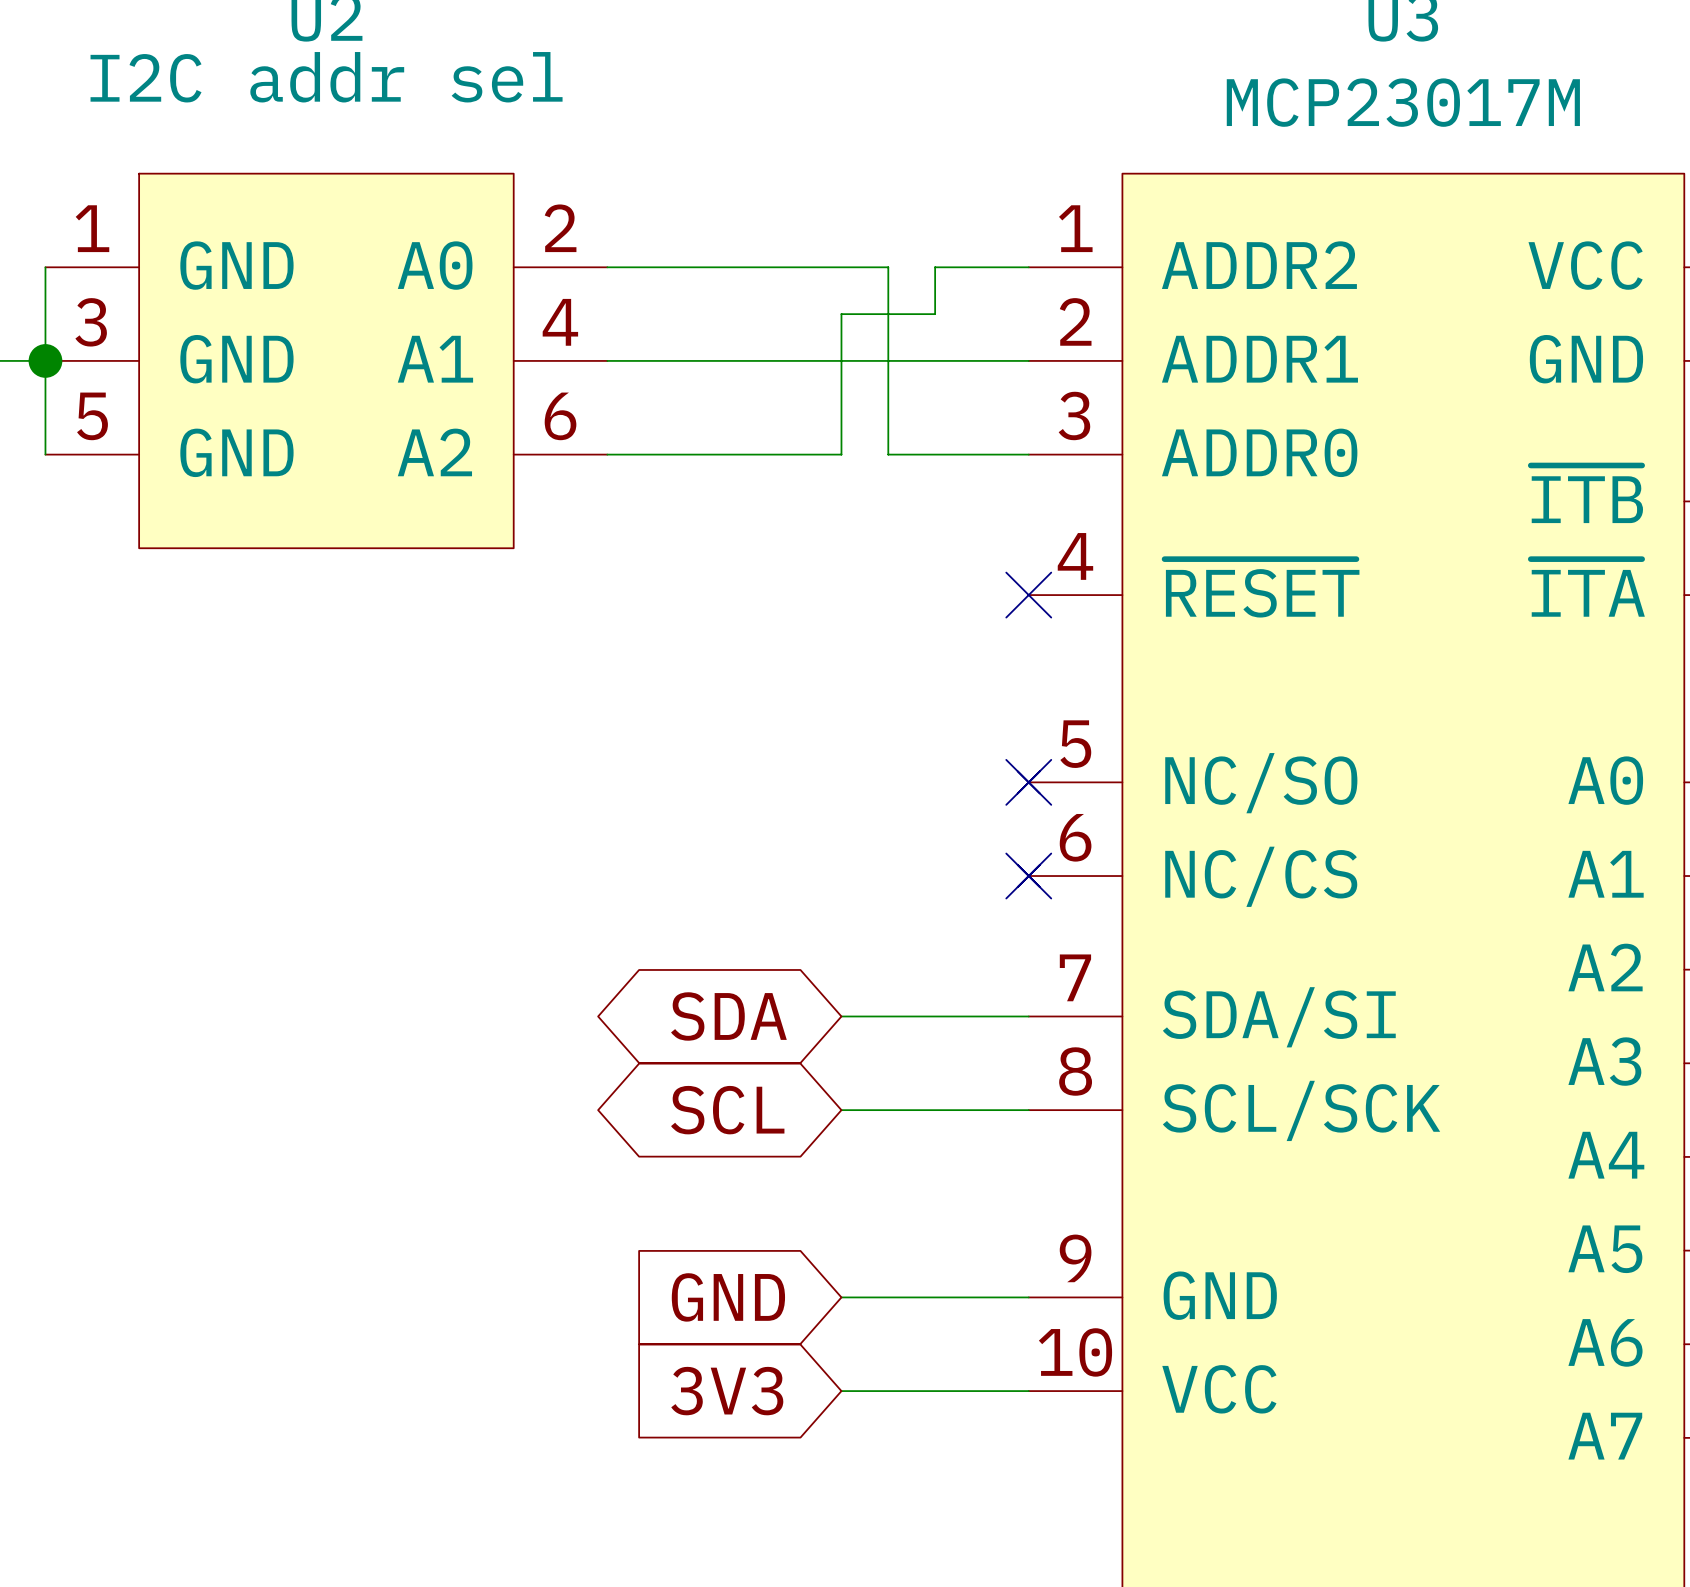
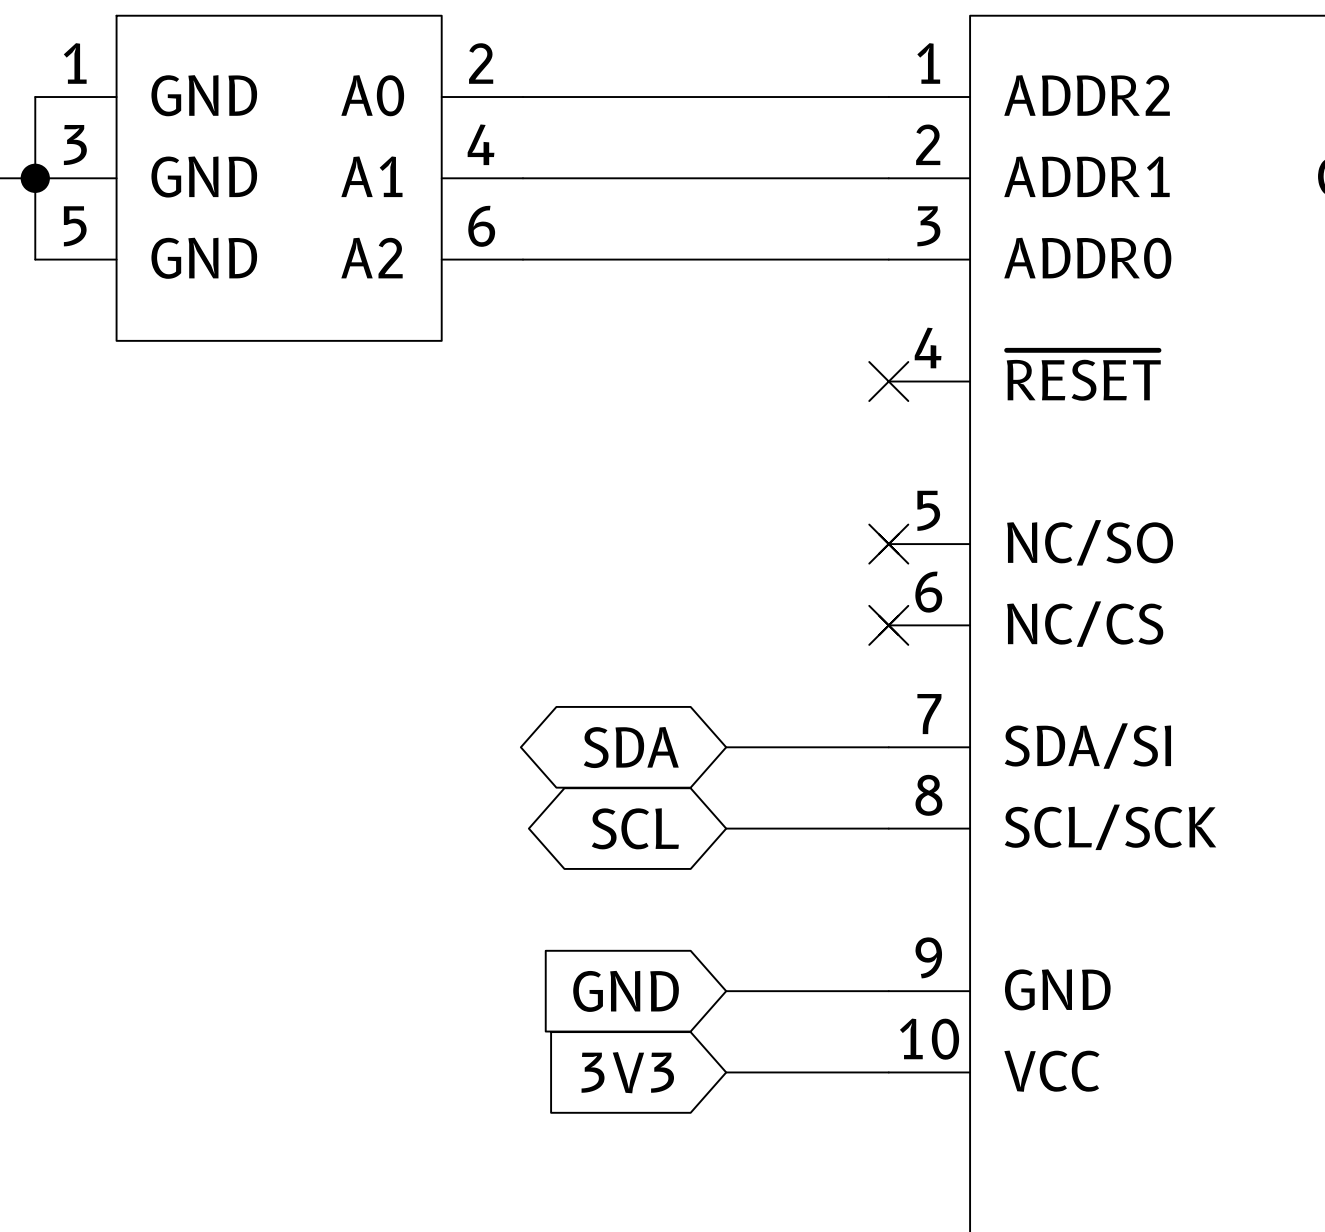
wire: (888, 267) (888, 454) -> (766, 97) (807, 97)
wire: (935, 267) (935, 314) (841, 314) (841, 454) -> (766, 259) (726, 259)

